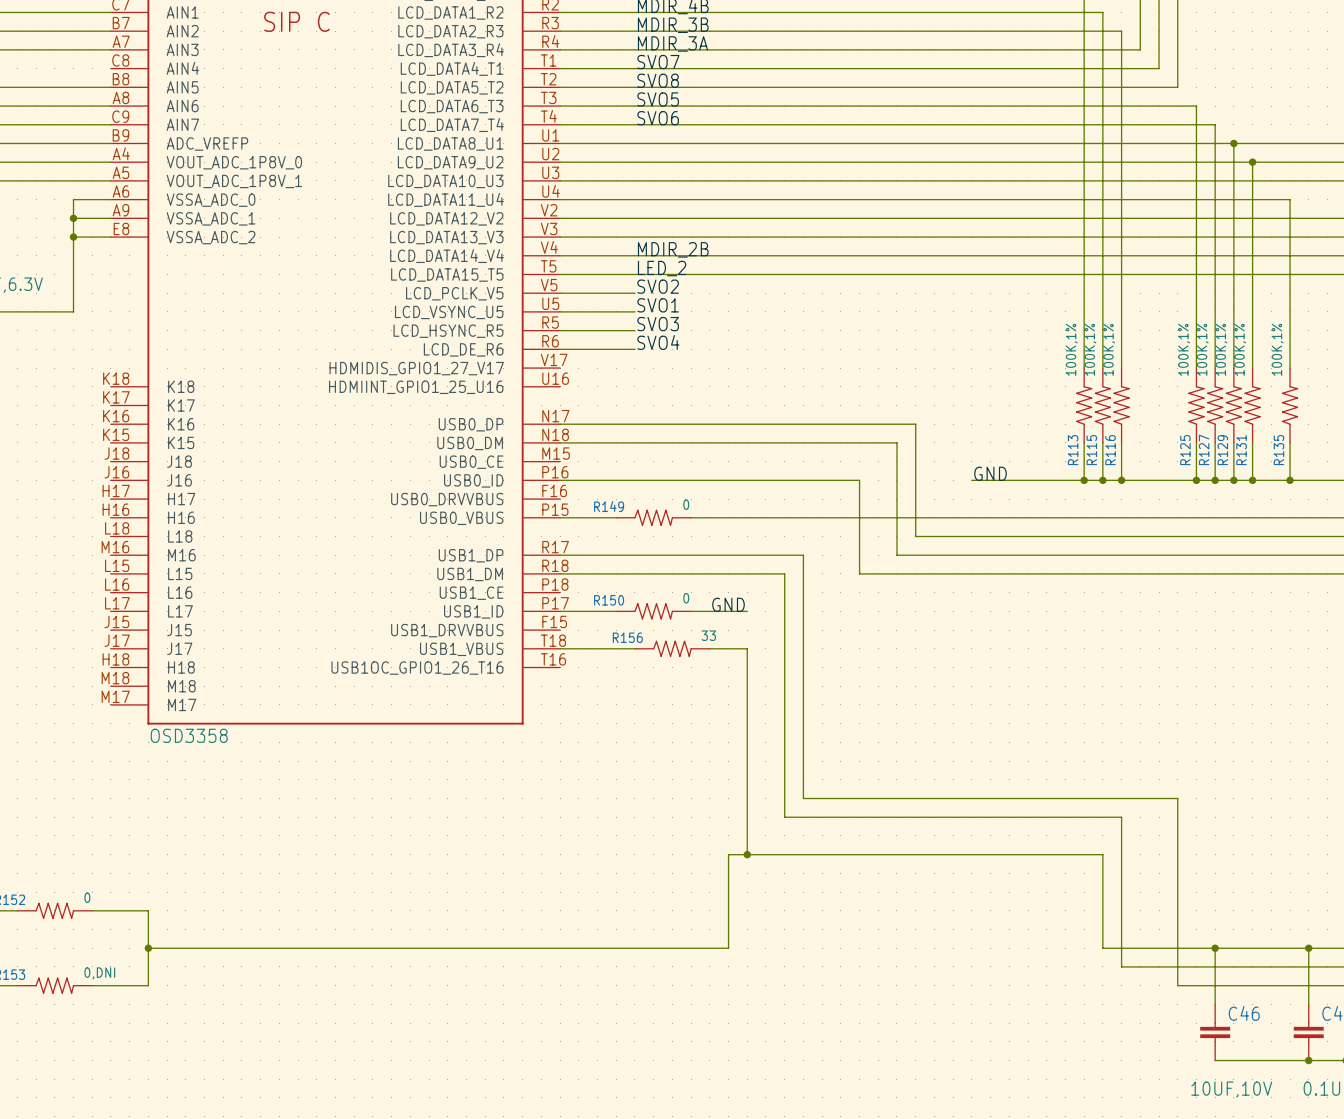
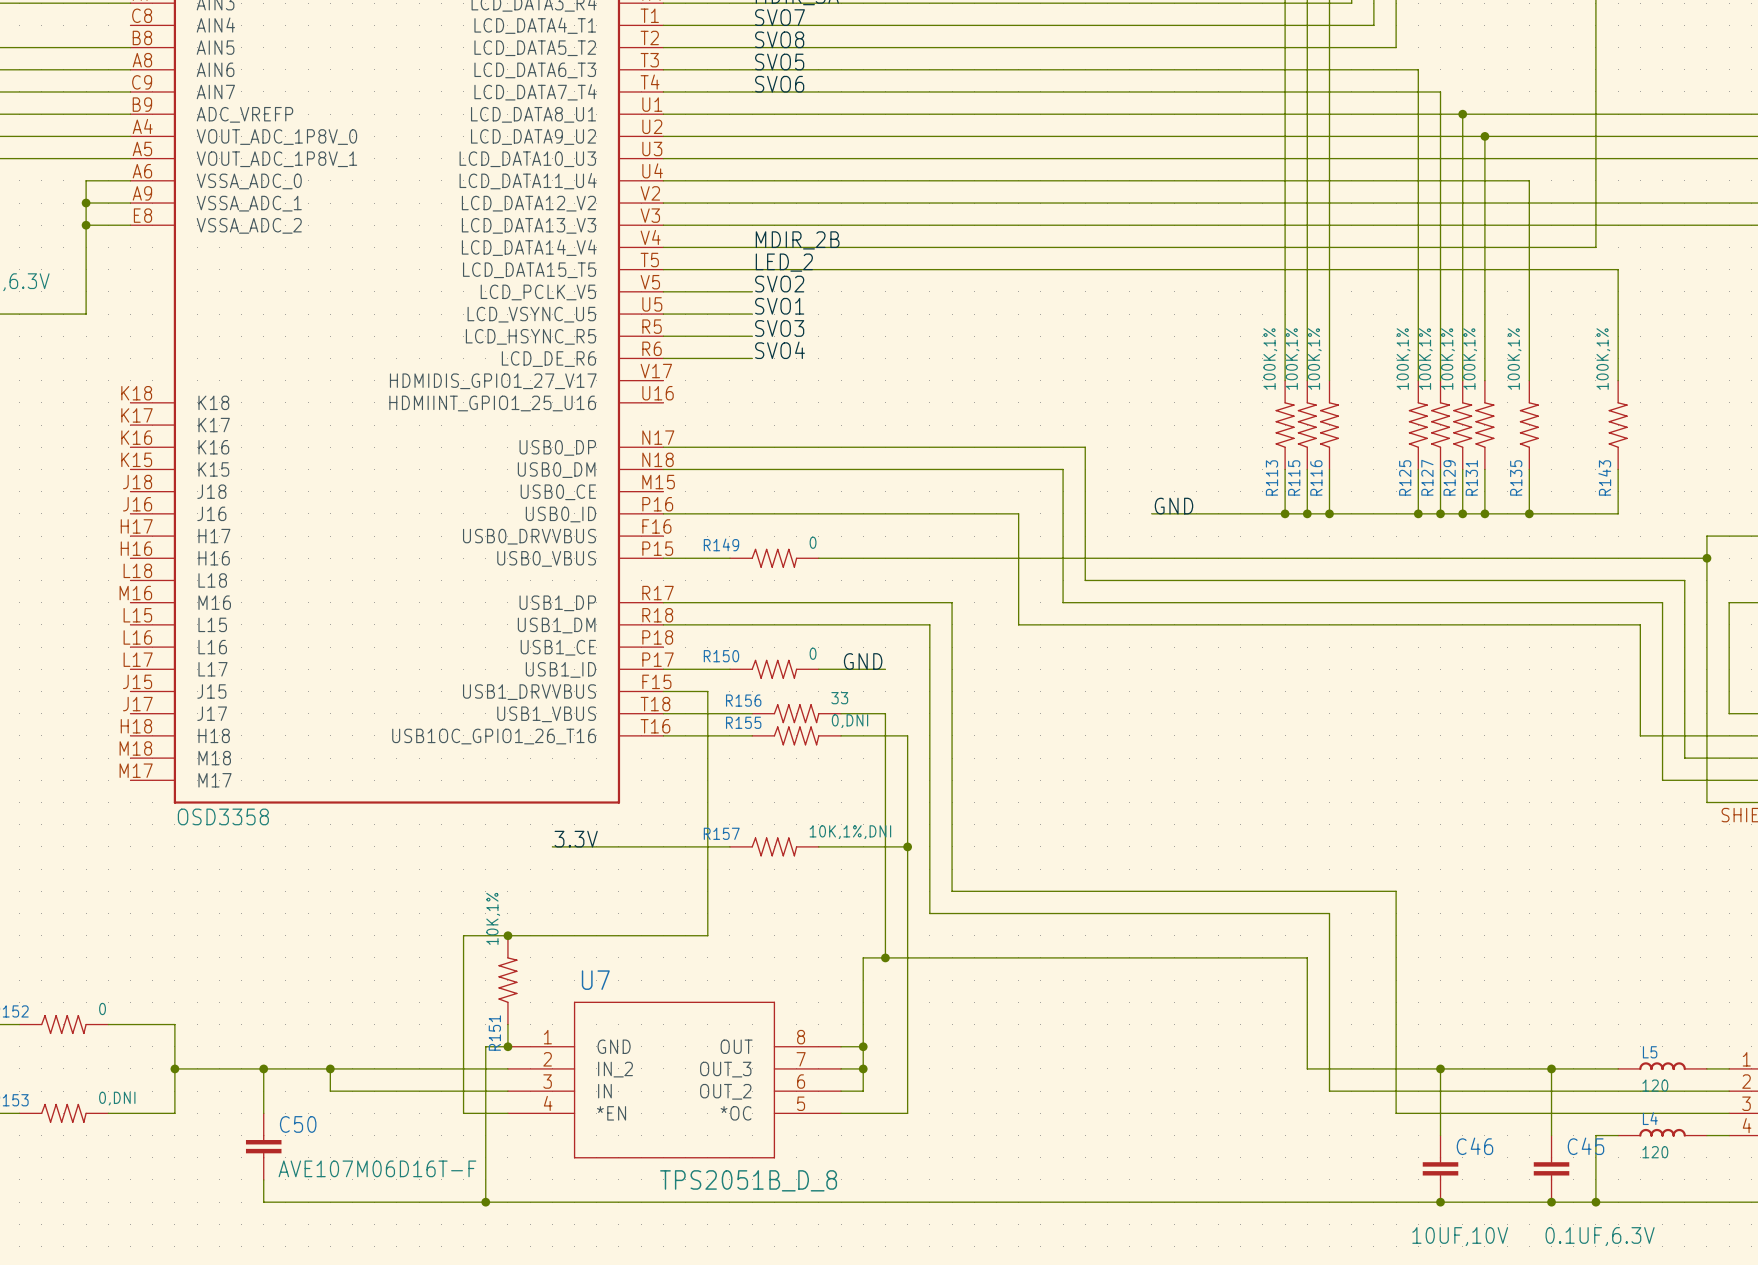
wire: none -> (663, 691) (707, 691) (707, 935) (463, 935) (463, 1113) (507, 1113)
wire: none -> (663, 735) (752, 735)
R155: none -> 0,DNI (796, 735)
wire: none -> (841, 735) (907, 735) (907, 1113) (841, 1113)
label: none -> 3.3V (576, 839)
wire: none -> (552, 846) (729, 846)
R157: none -> 10K,1%,DNI (774, 846)
wire: none -> (818, 846) (907, 846)
junction: none -> (907, 846)
junction: none -> (507, 935)
R151: none -> 10K,1% (507, 980)
wire: none -> (507, 1024) (507, 1046) (485, 1046) (485, 1202)
junction: none -> (507, 1046)
wire: none -> (841, 1046) (863, 1046)
junction: none -> (863, 1046)
wire: none -> (263, 1068) (263, 1113)
junction: none -> (263, 1068)
wire: none -> (330, 1068) (330, 1091) (507, 1091)
junction: none -> (330, 1068)
wire: (429, 948) (709, 948) -> none
wire: none -> (863, 1068) (863, 1091) (841, 1091)
junction: none -> (863, 1068)
U7: none -> TPS2051B_D_8 (674, 1080)
C50: none -> AVE107M06D16T-F (263, 1146)
wire: none -> (263, 1179) (263, 1202) (1440, 1202)
junction: none -> (485, 1202)
junction: none -> (1440, 1202)

